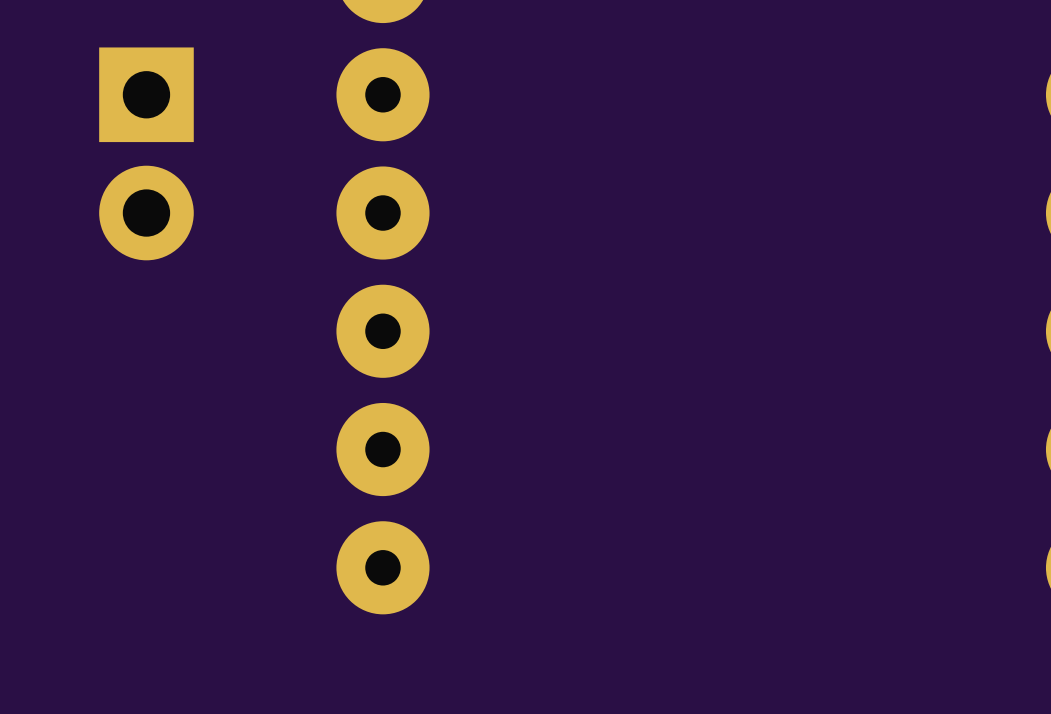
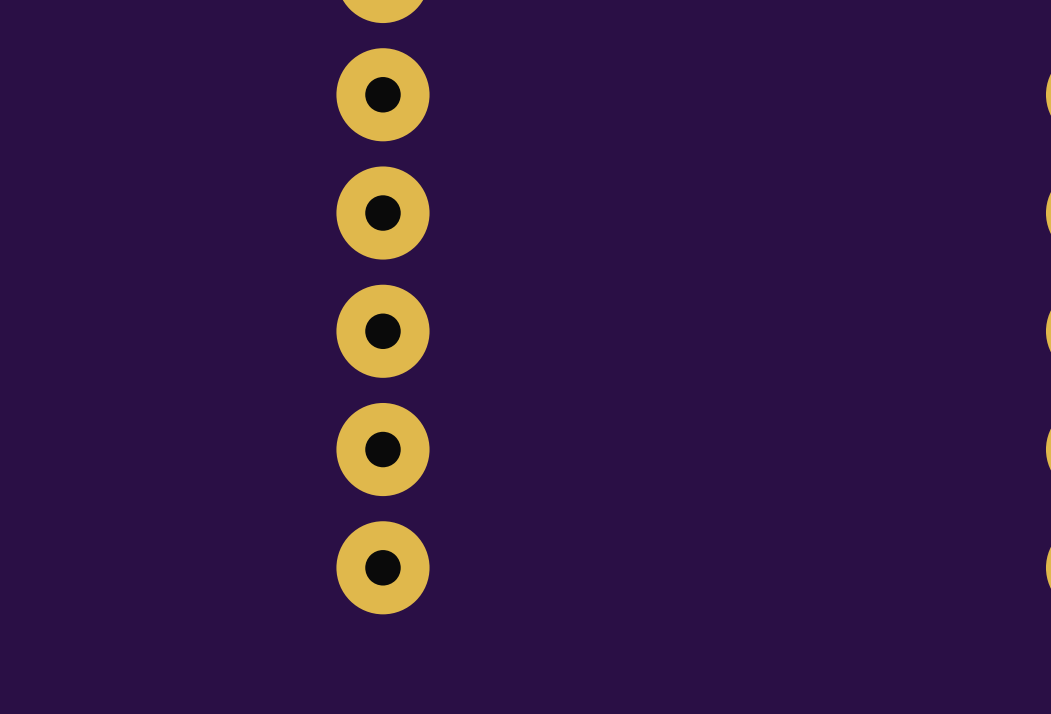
part: (146, 153) -> none

